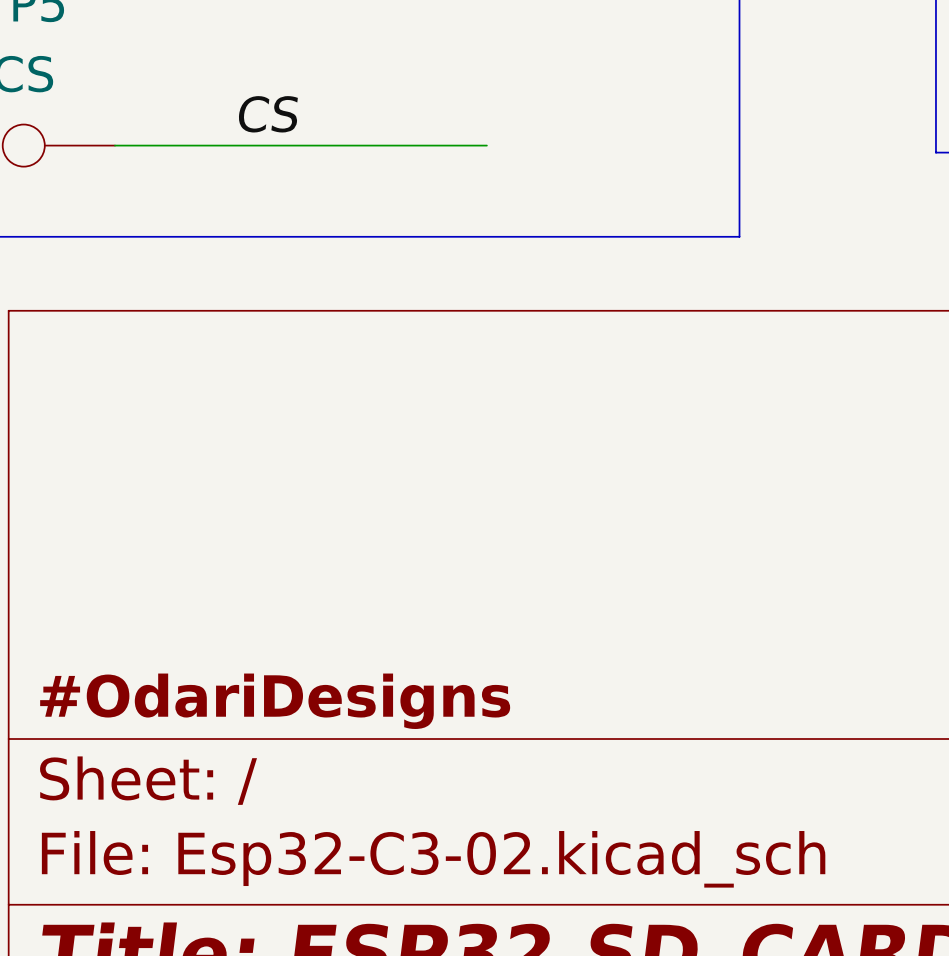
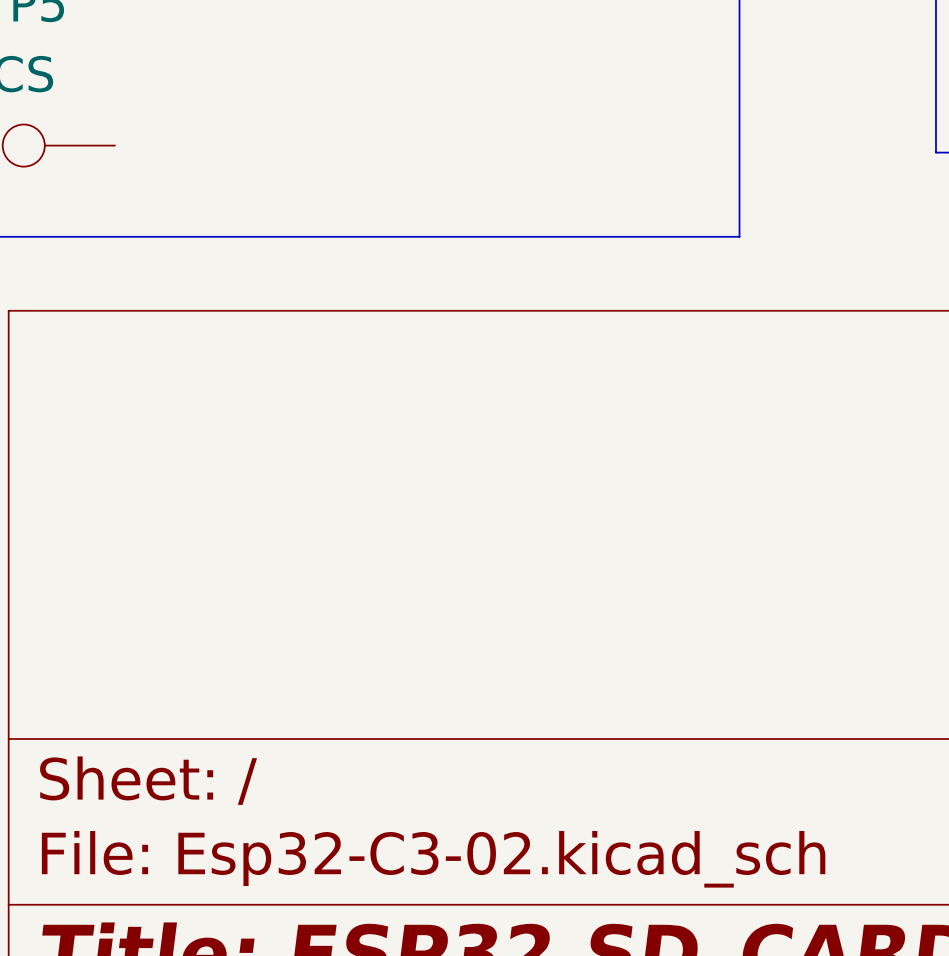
label: CS (267, 114) -> none
wire: (114, 145) (486, 145) -> none
title block: #OdariDesigns (275, 701) -> none

